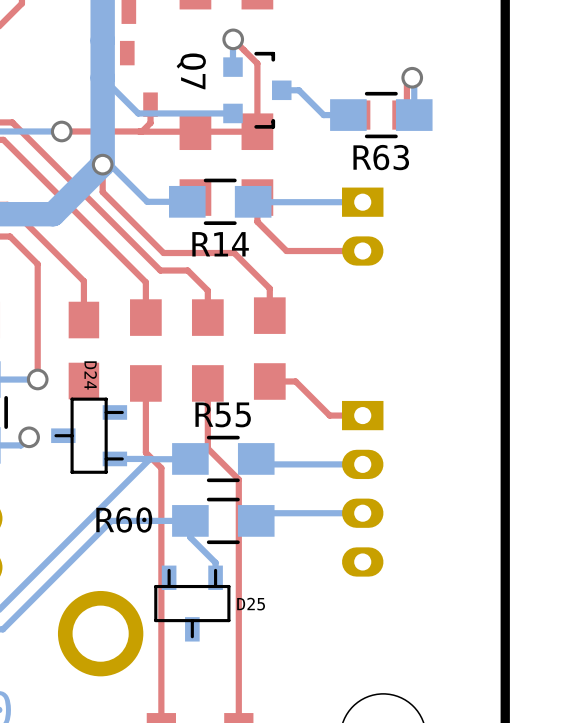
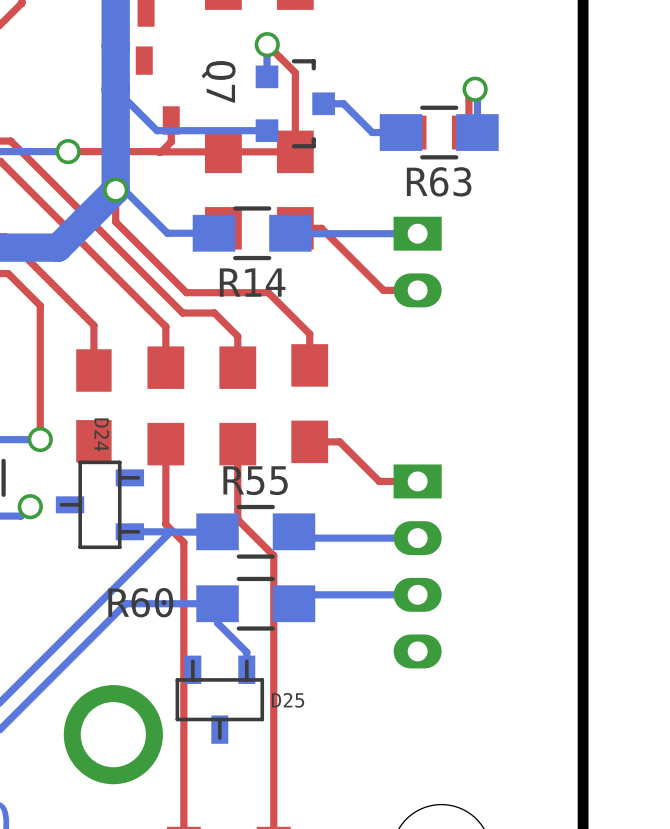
top track: (257, 197) (257, 221) (286, 251) (333, 251) -> (295, 228) (321, 228) (383, 290)

